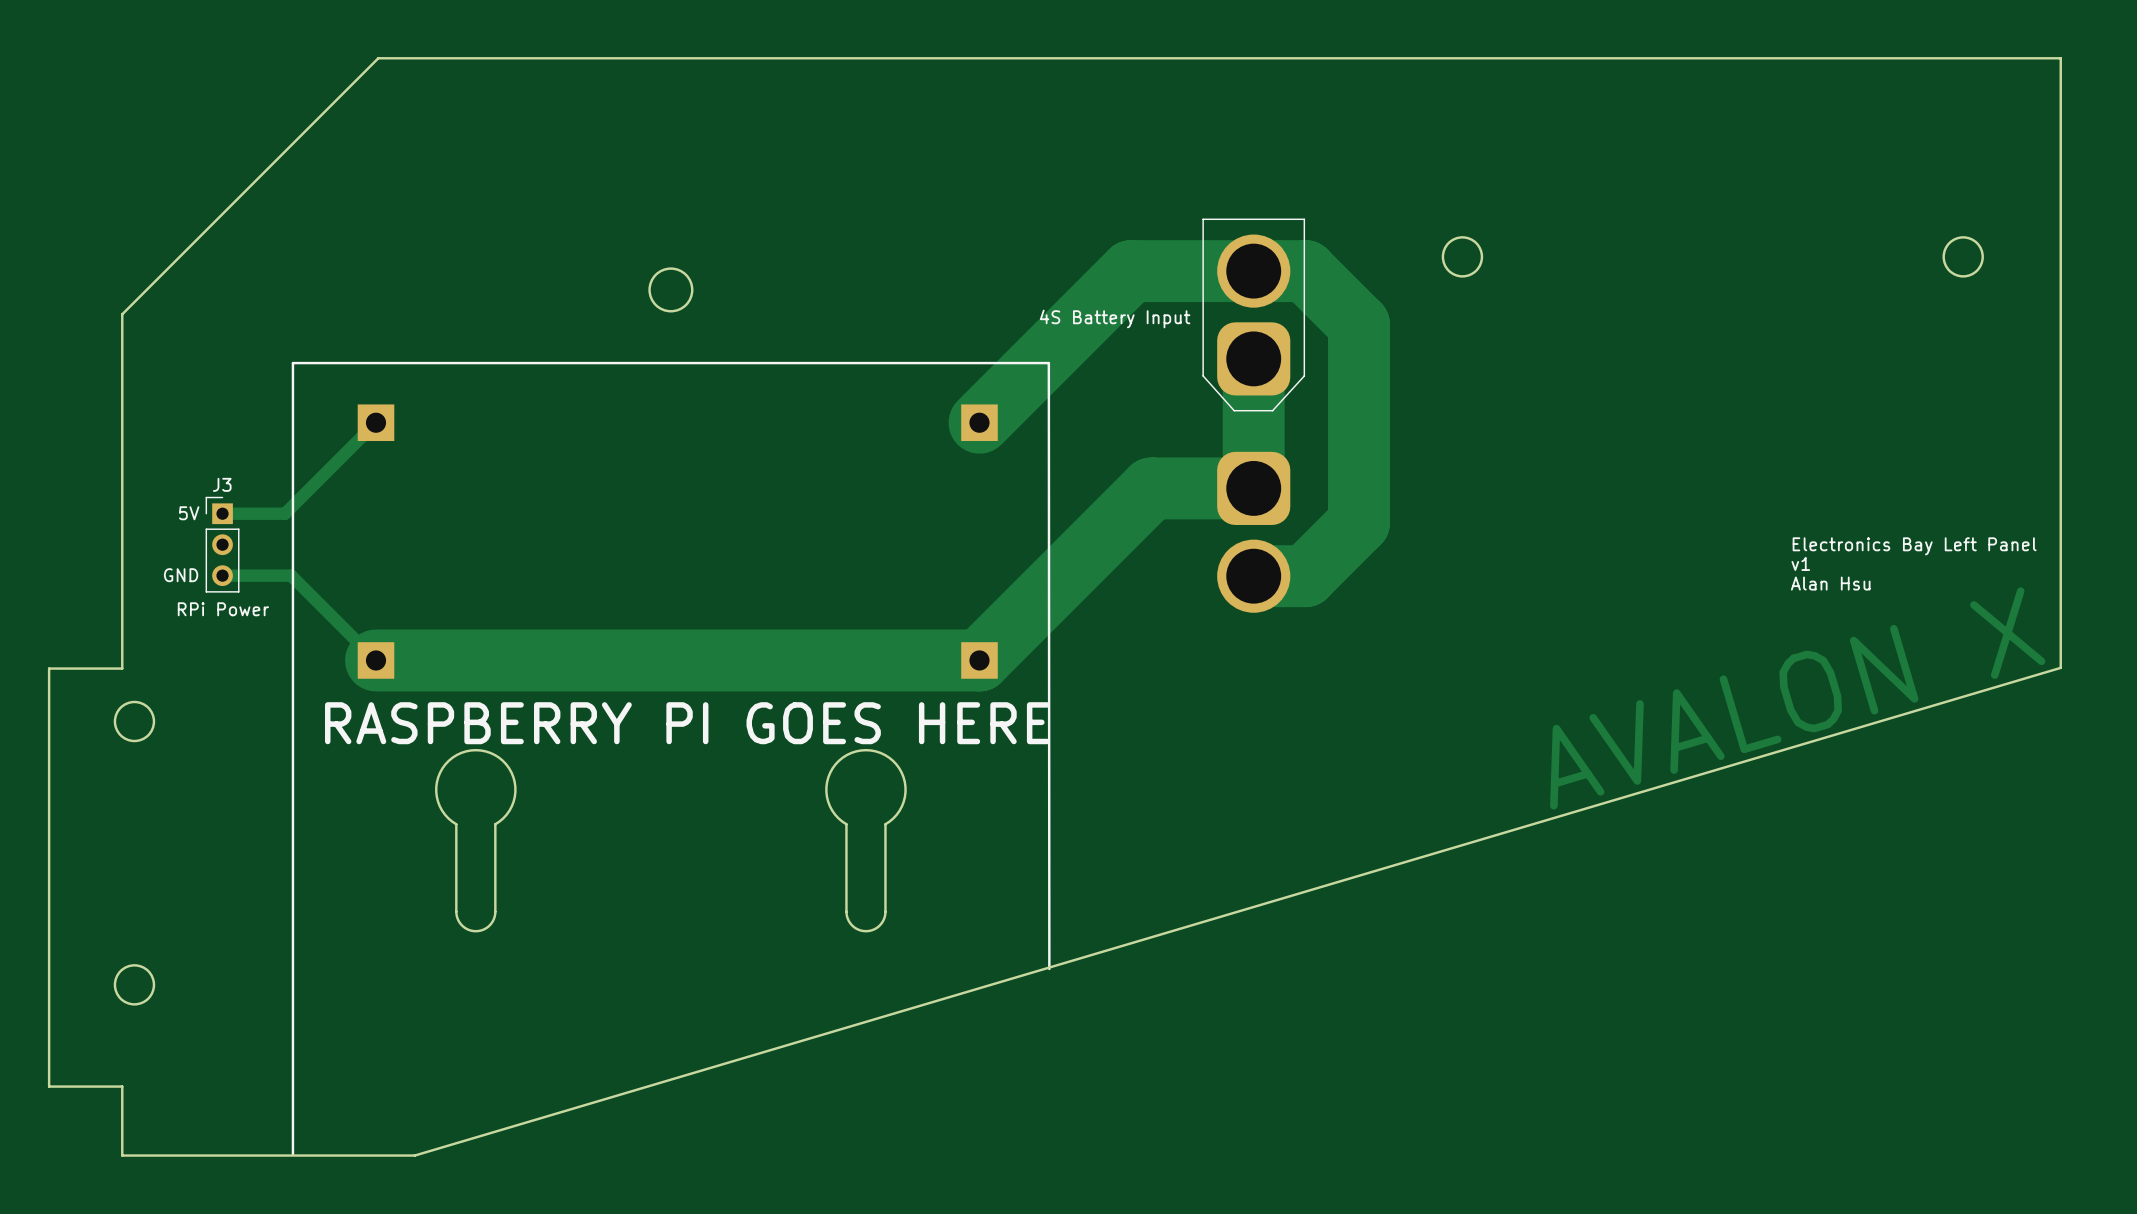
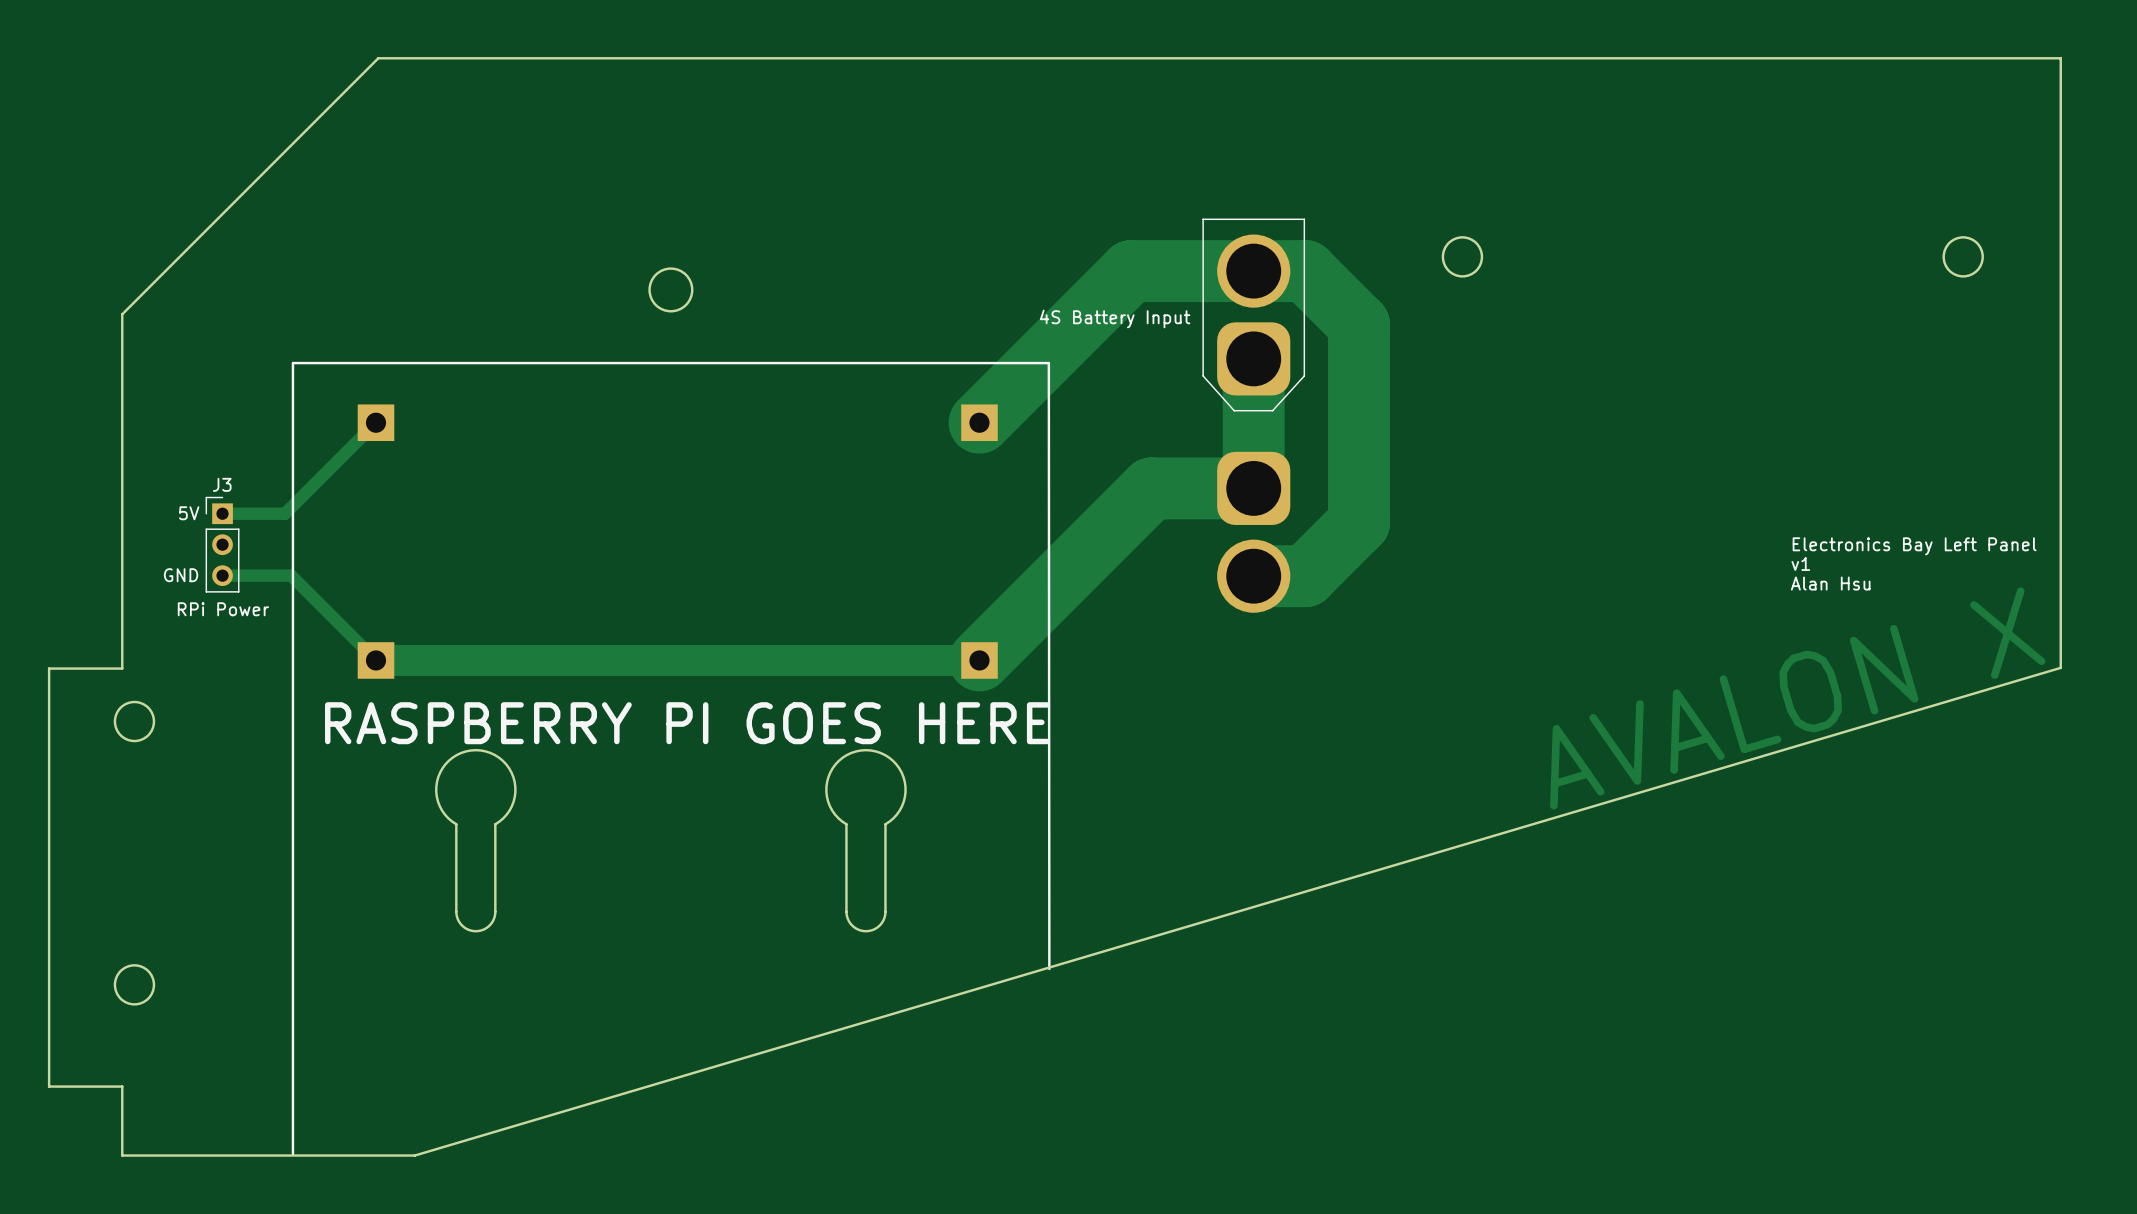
track width: thick (376, 660) (979, 660) -> thin (376, 660) (979, 660)

